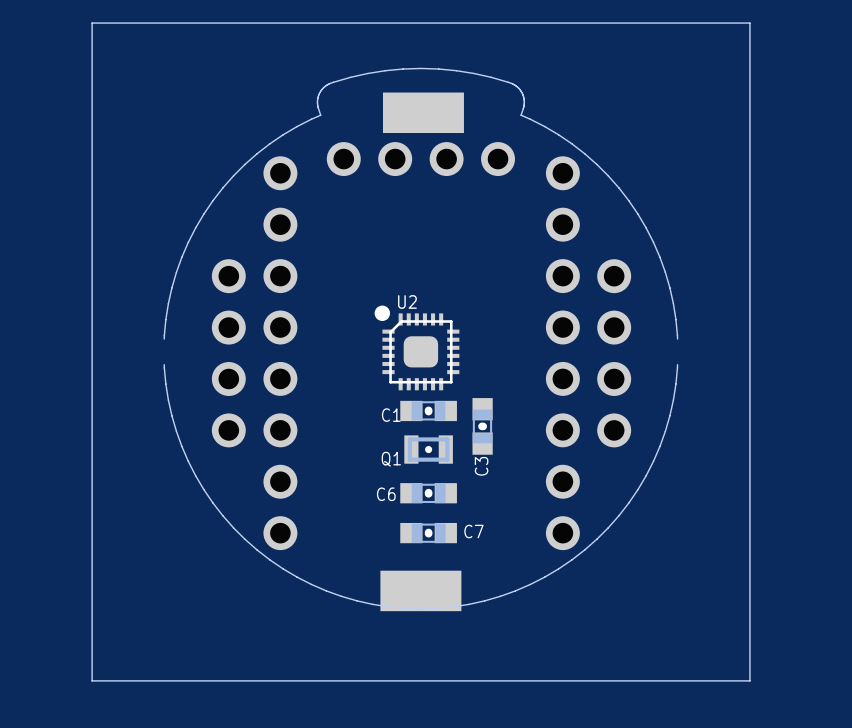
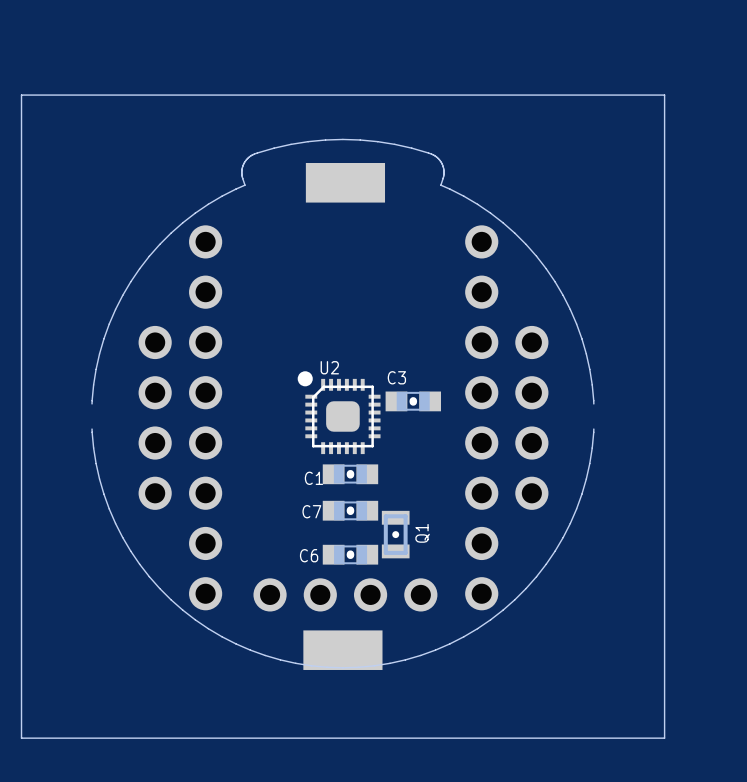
part position: (420, 159) -> (345, 594)
C3 rotation: 0° (482, 426) -> 90° clockwise (413, 401)
C3 position: (482, 426) -> (413, 401)
Q1 rotation: 0° (428, 449) -> 90° clockwise (395, 534)
Q1 position: (428, 449) -> (395, 534)
Q1 name position: Q1 (391, 459) -> Q1 (422, 533)
C7 name position: C7 (473, 531) -> C7 (311, 511)
C7 position: (428, 533) -> (350, 510)

